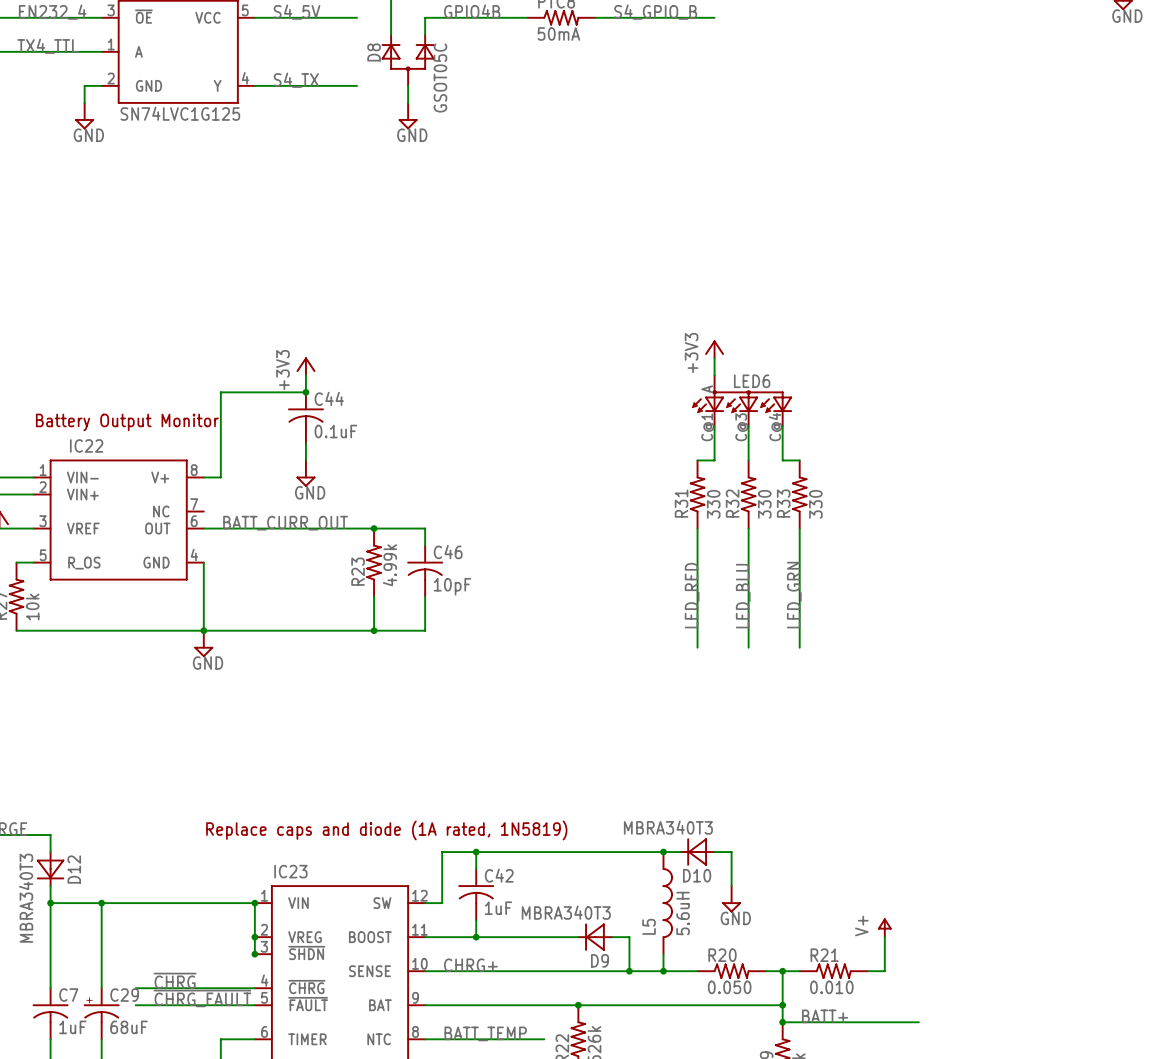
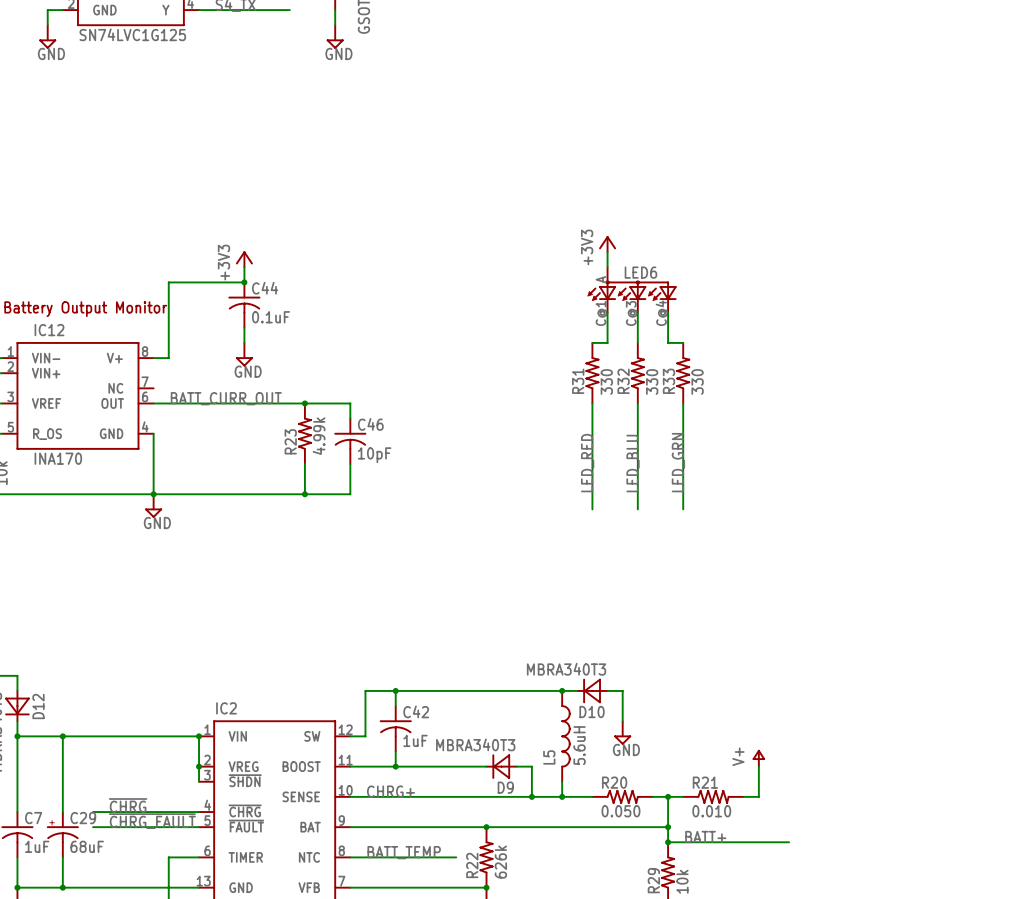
IC22 name: IC22 (86, 445) -> IC12 (49, 330)
IC22 value: none -> INA170 (58, 458)
text: Replace caps and diode (1A rated, 1N5819) (386, 830) -> none
IC23 name: IC23 (290, 871) -> IC2 (226, 708)
junction: (254, 954) -> none

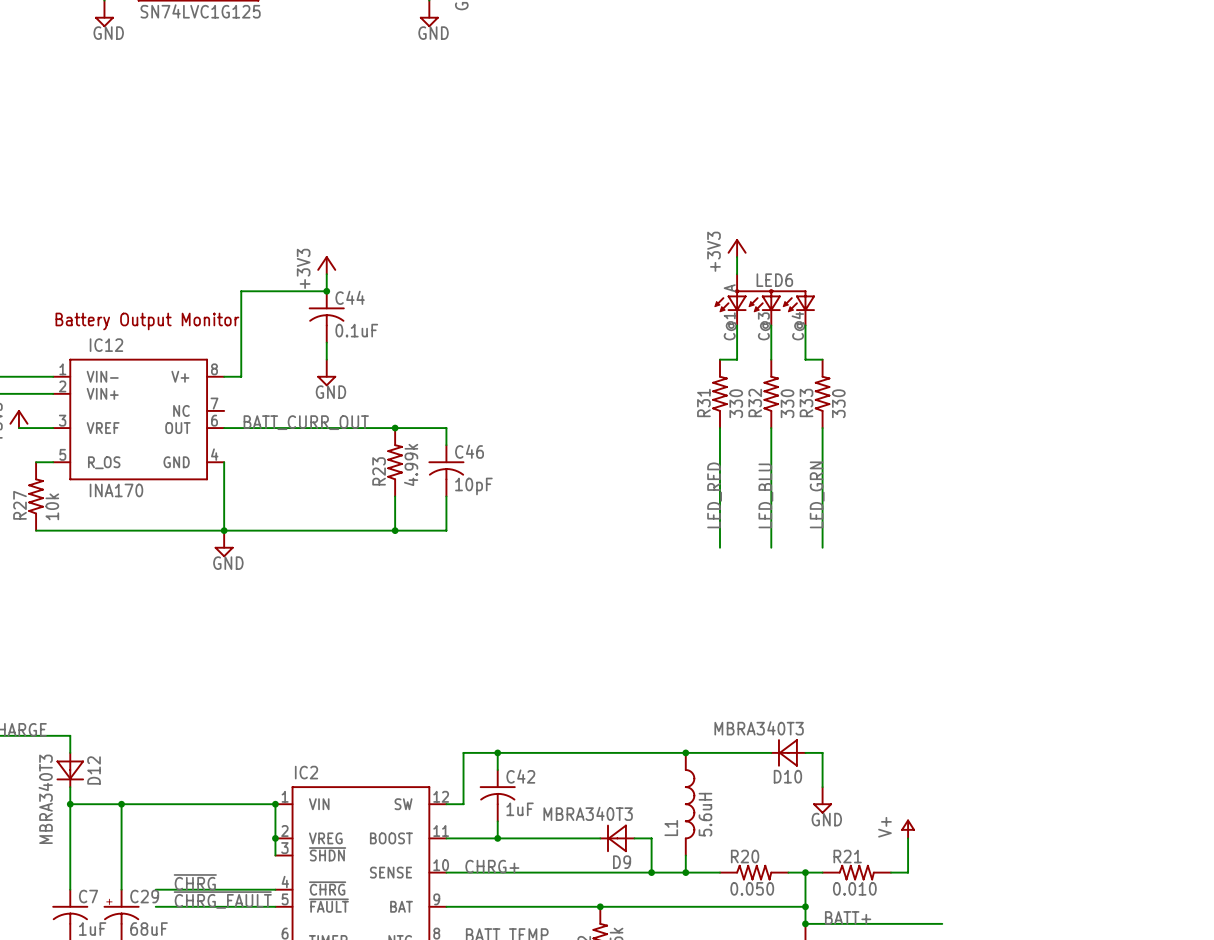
D10 position: (592, 690) -> (788, 752)
wire: (622, 690) (622, 721) -> (754, 752) (771, 752)
wire: none -> (805, 752) (822, 752) (822, 787)
power symbol position: GND (622, 732) -> GND (822, 800)
L5 name: L5 (549, 757) -> L1 (671, 828)

